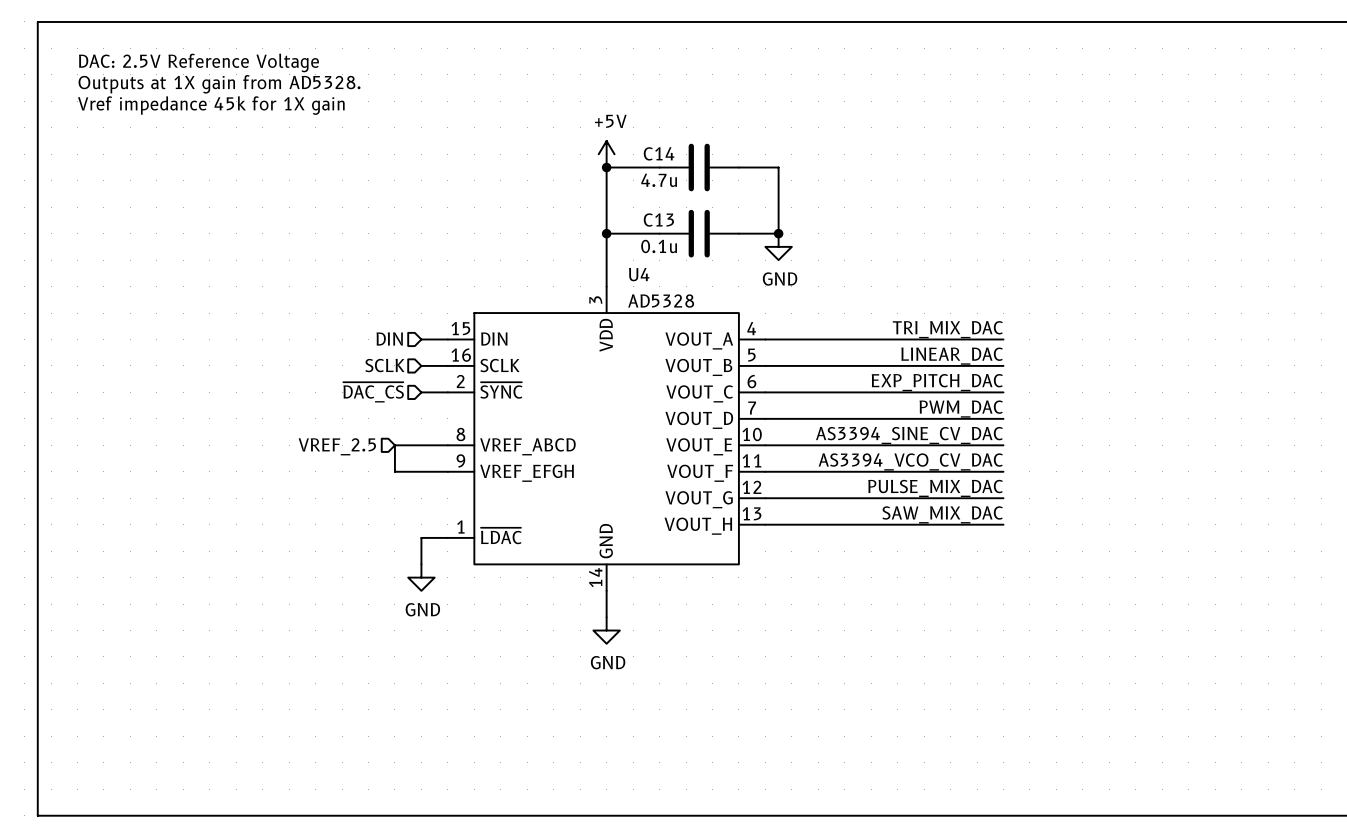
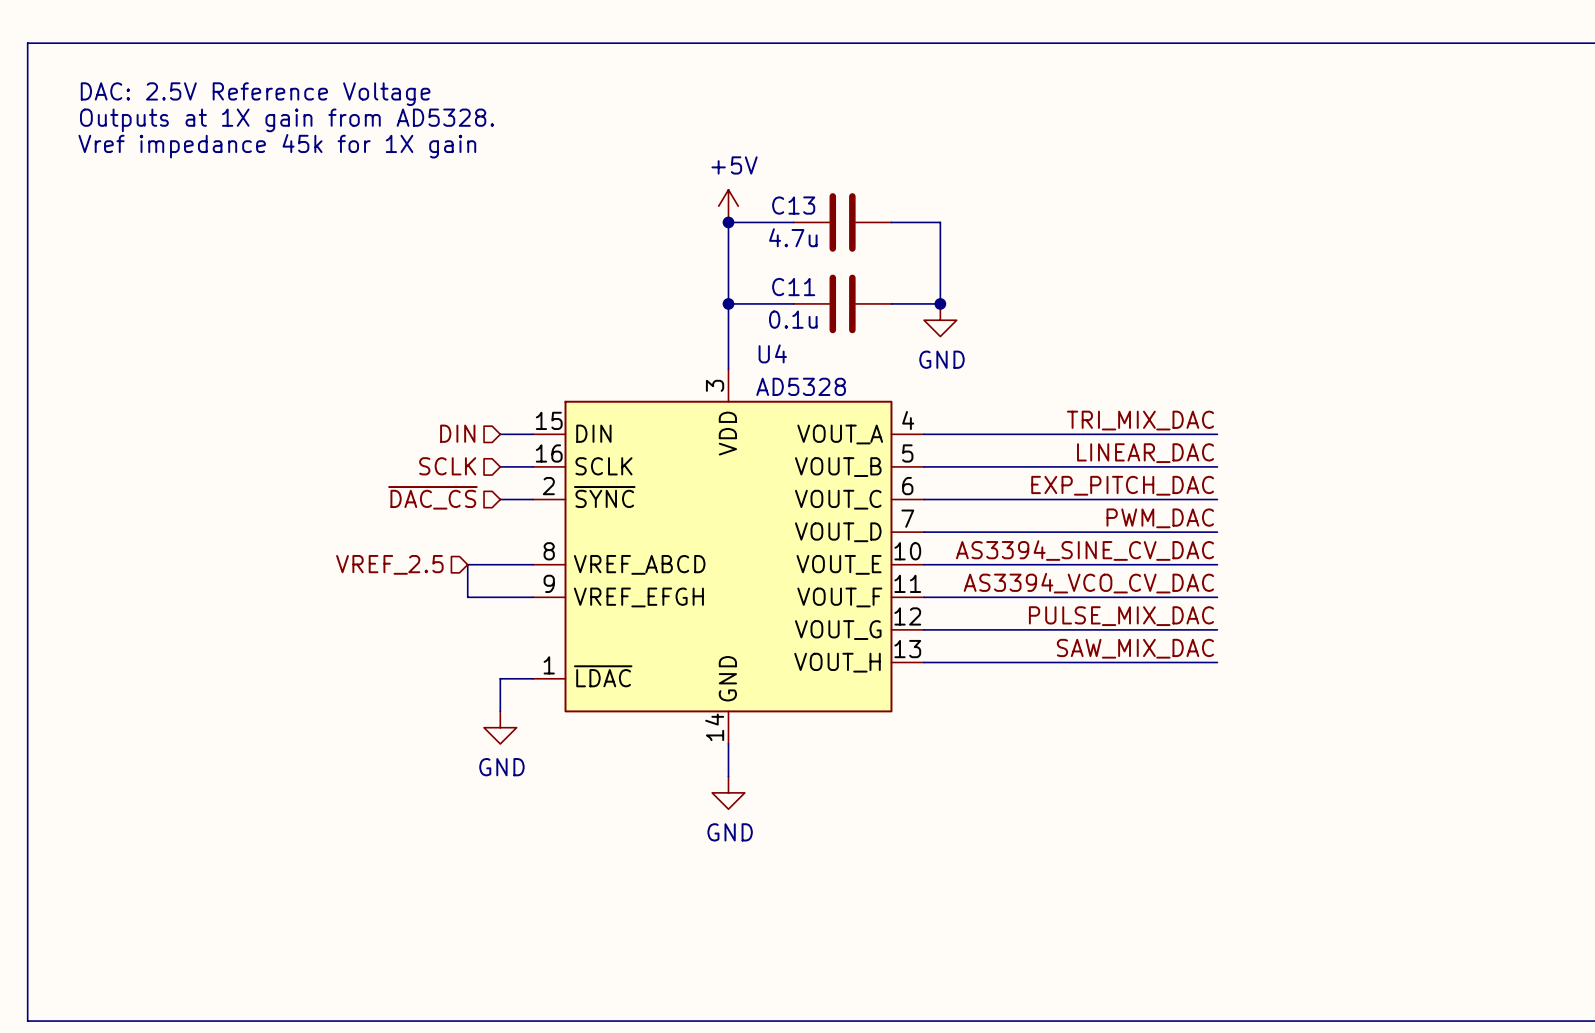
C14 name: C14 (659, 153) -> C13 (793, 205)
C13 name: C13 (658, 220) -> C11 (793, 287)

